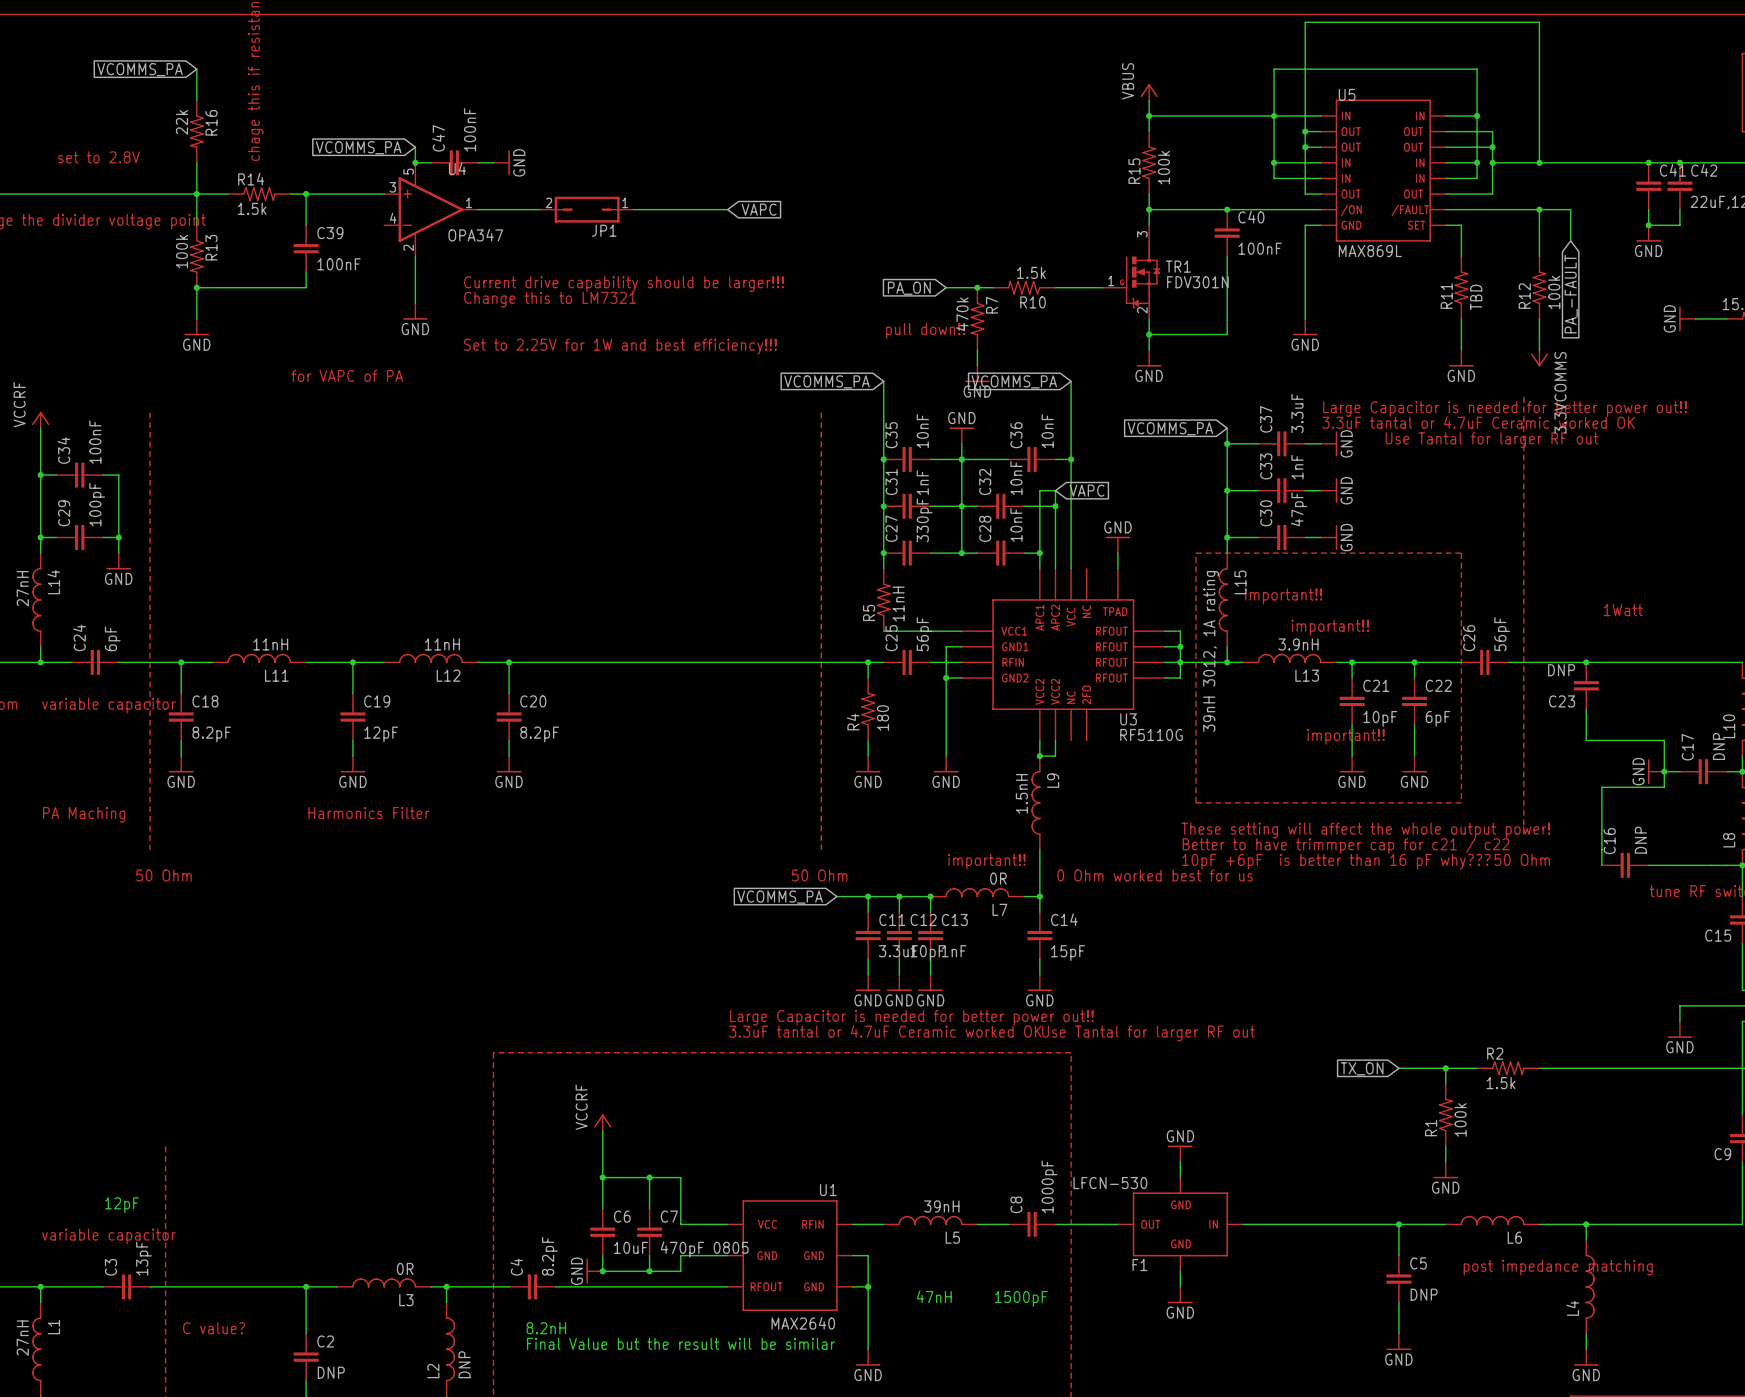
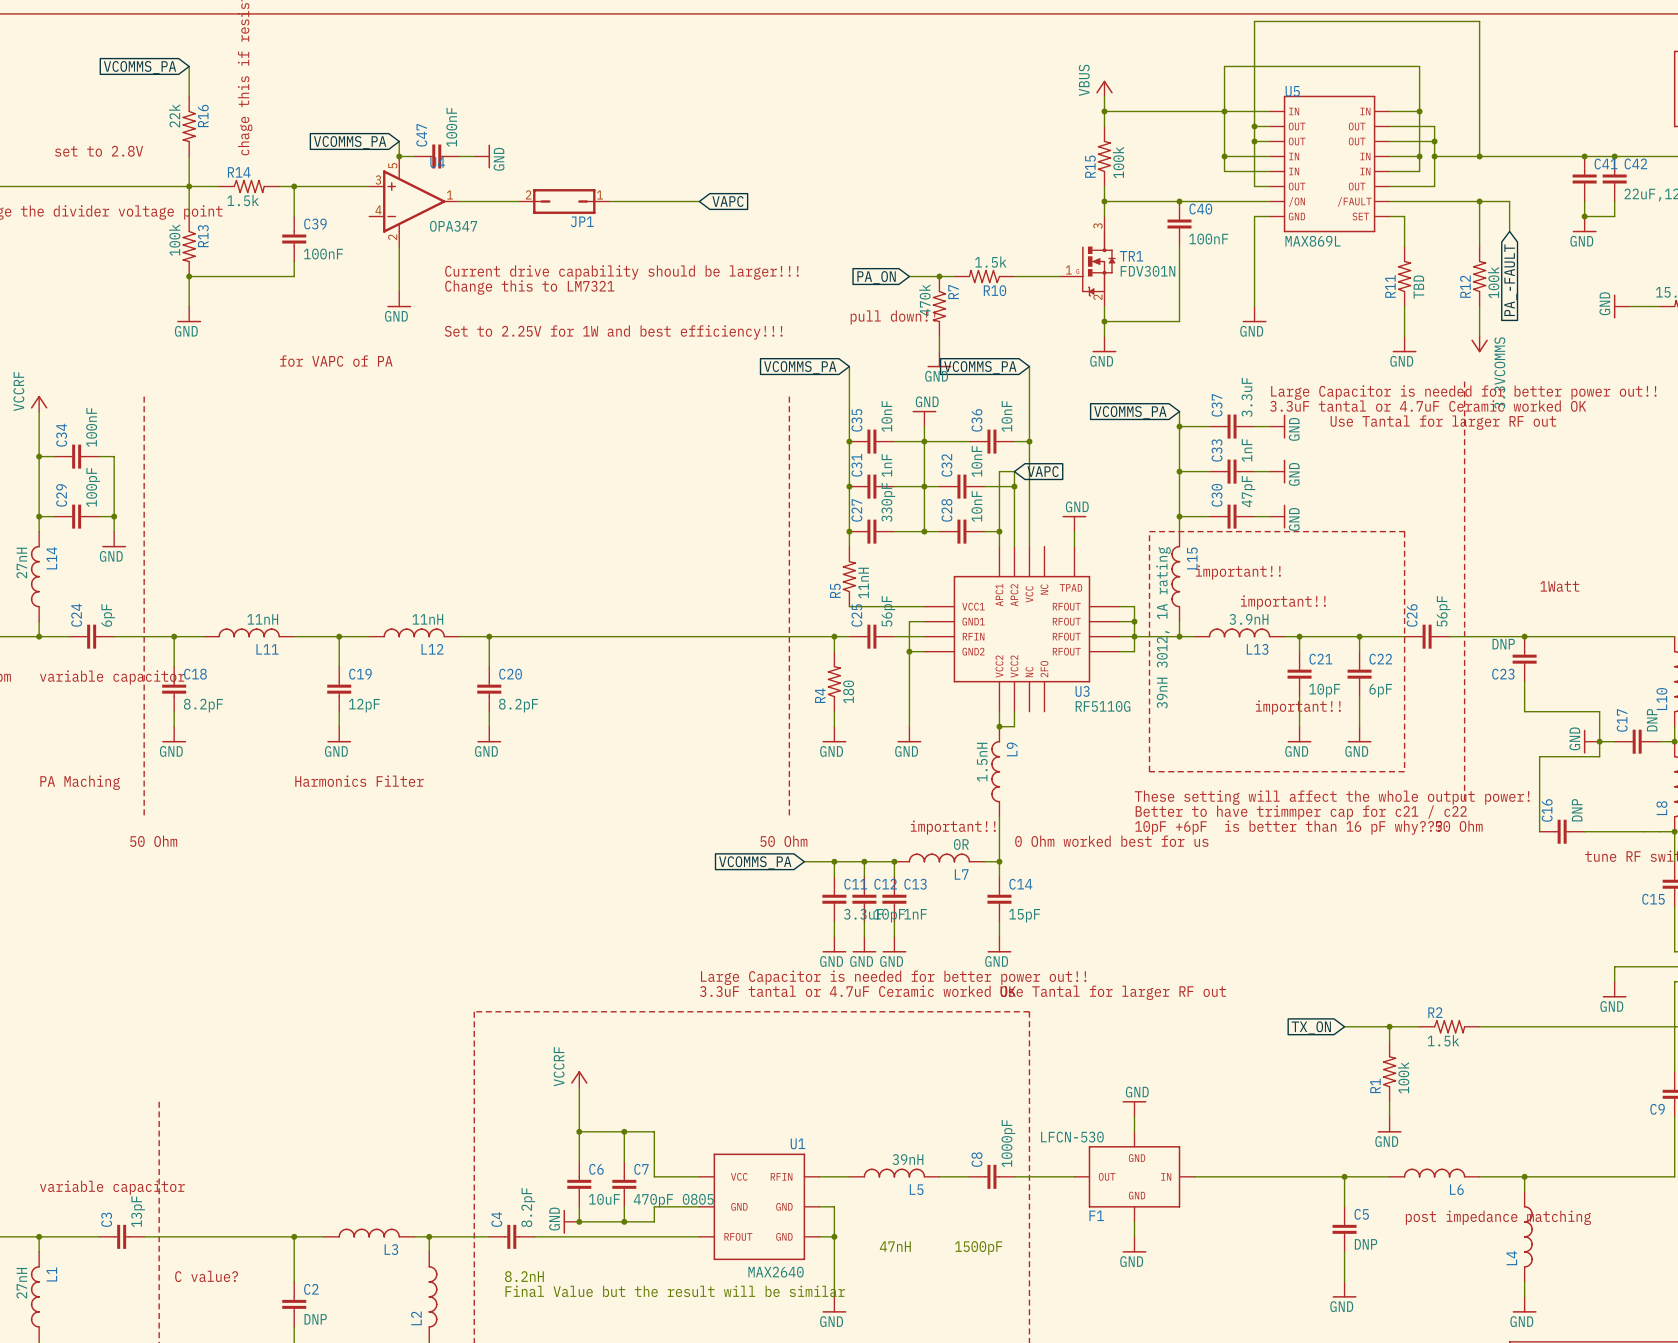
text: 12pF (122, 1205) -> none
L3 value: 0R (405, 1268) -> none
L2 value: DNP (464, 1364) -> none

